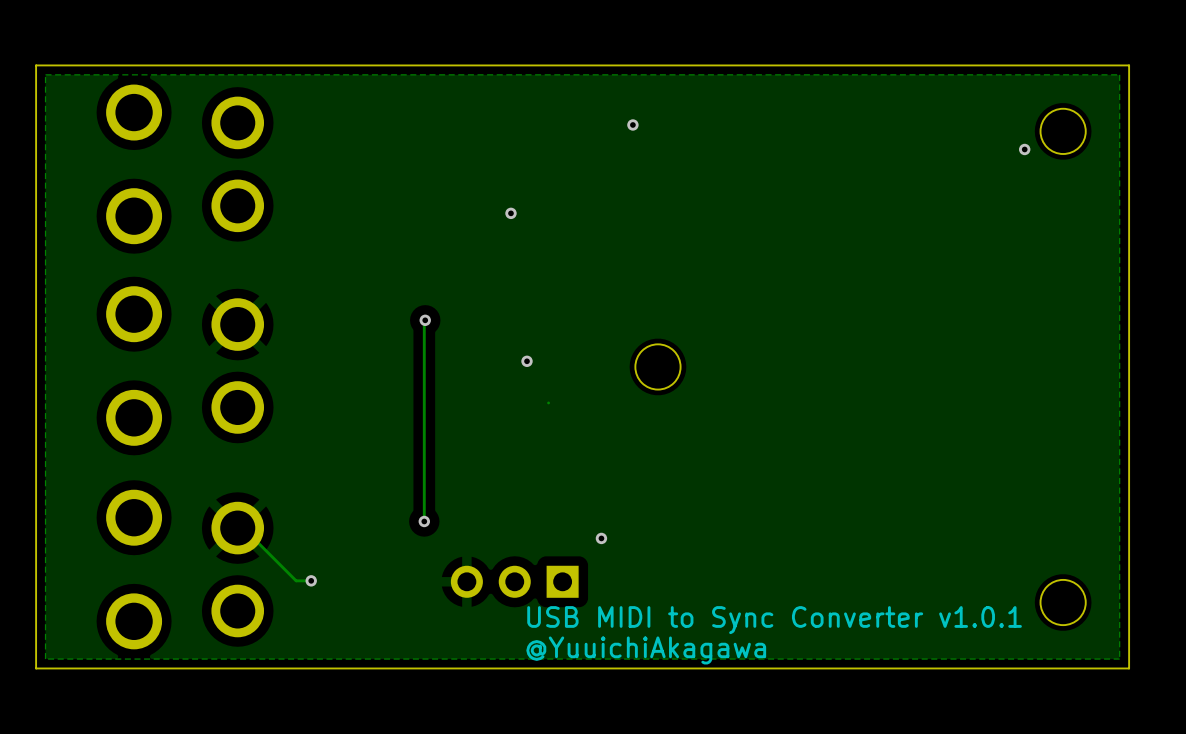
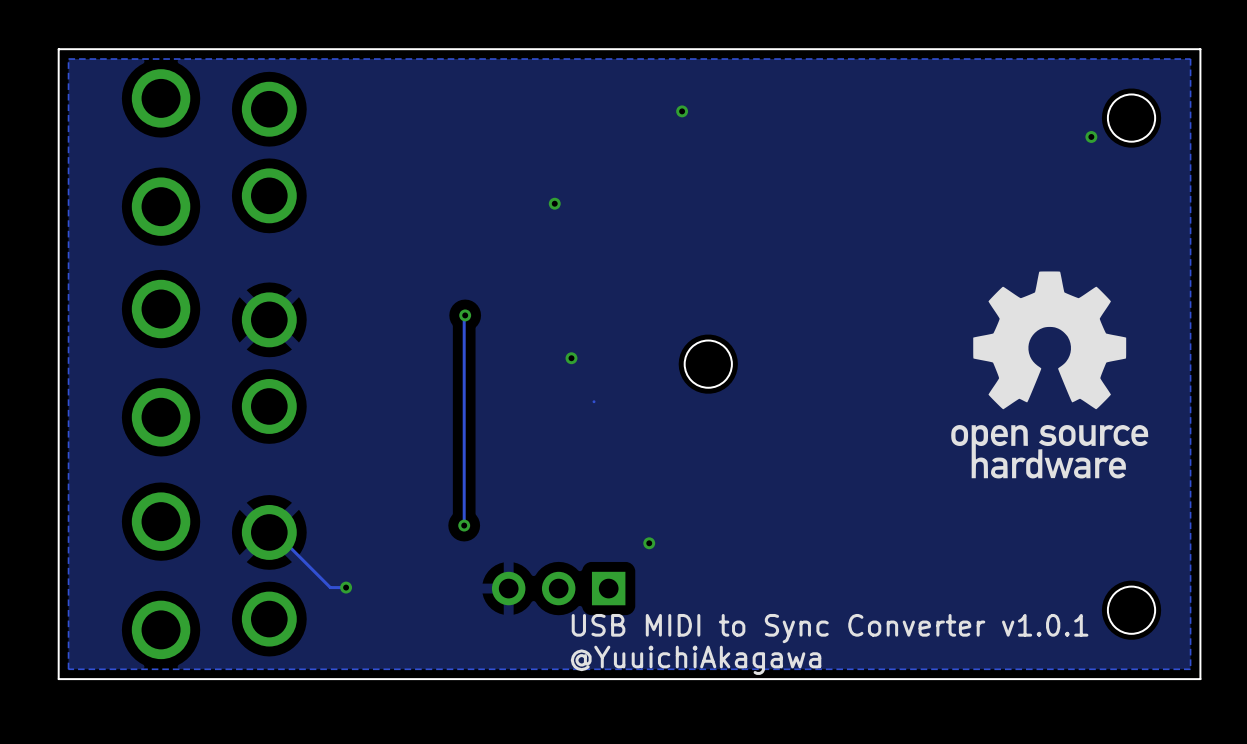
drawing: none -> [951, 271, 1149, 479]

